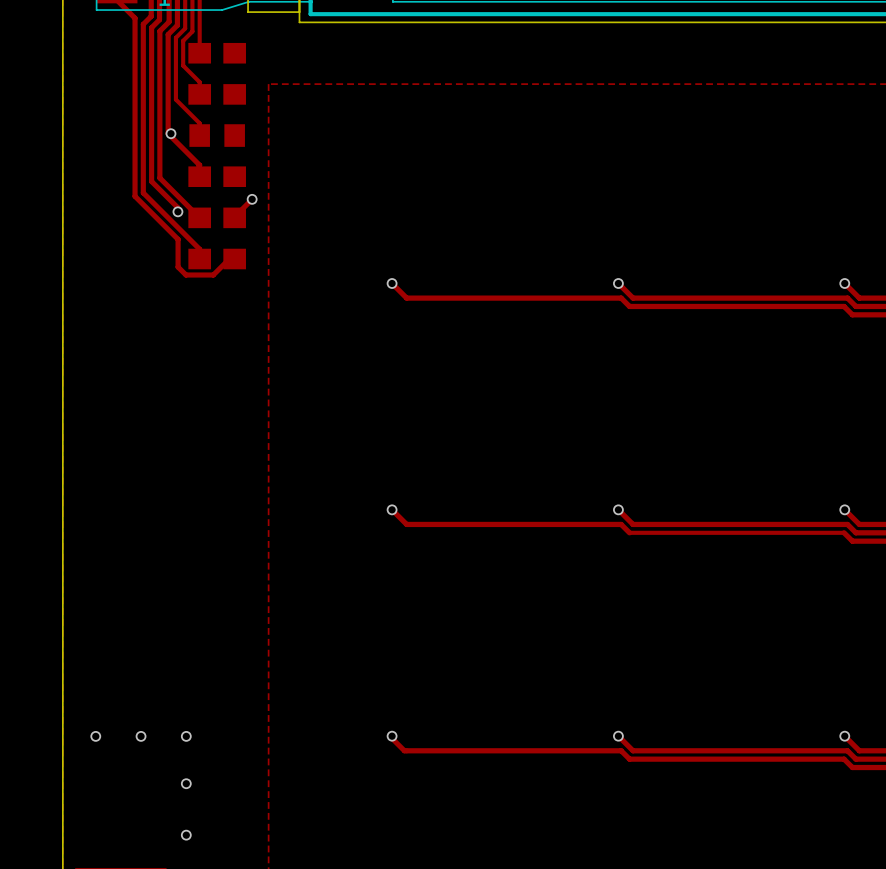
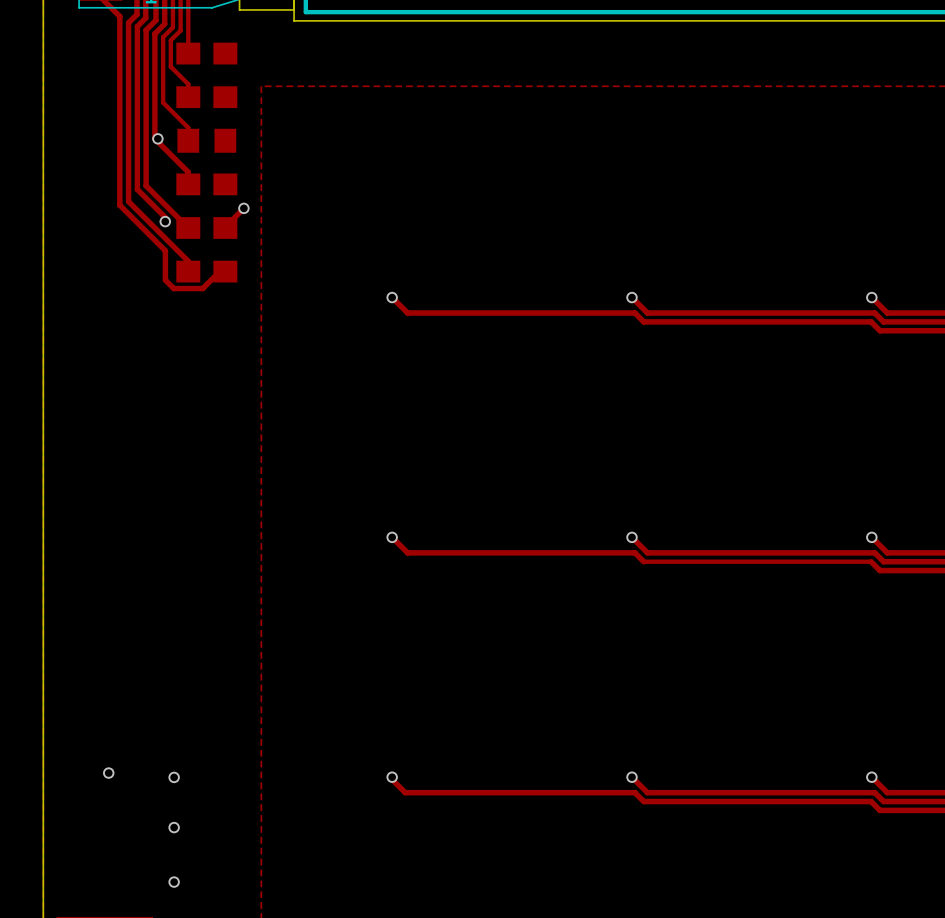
via: none -> (108, 773)
via: (95, 736) -> none
via: (141, 736) -> none

